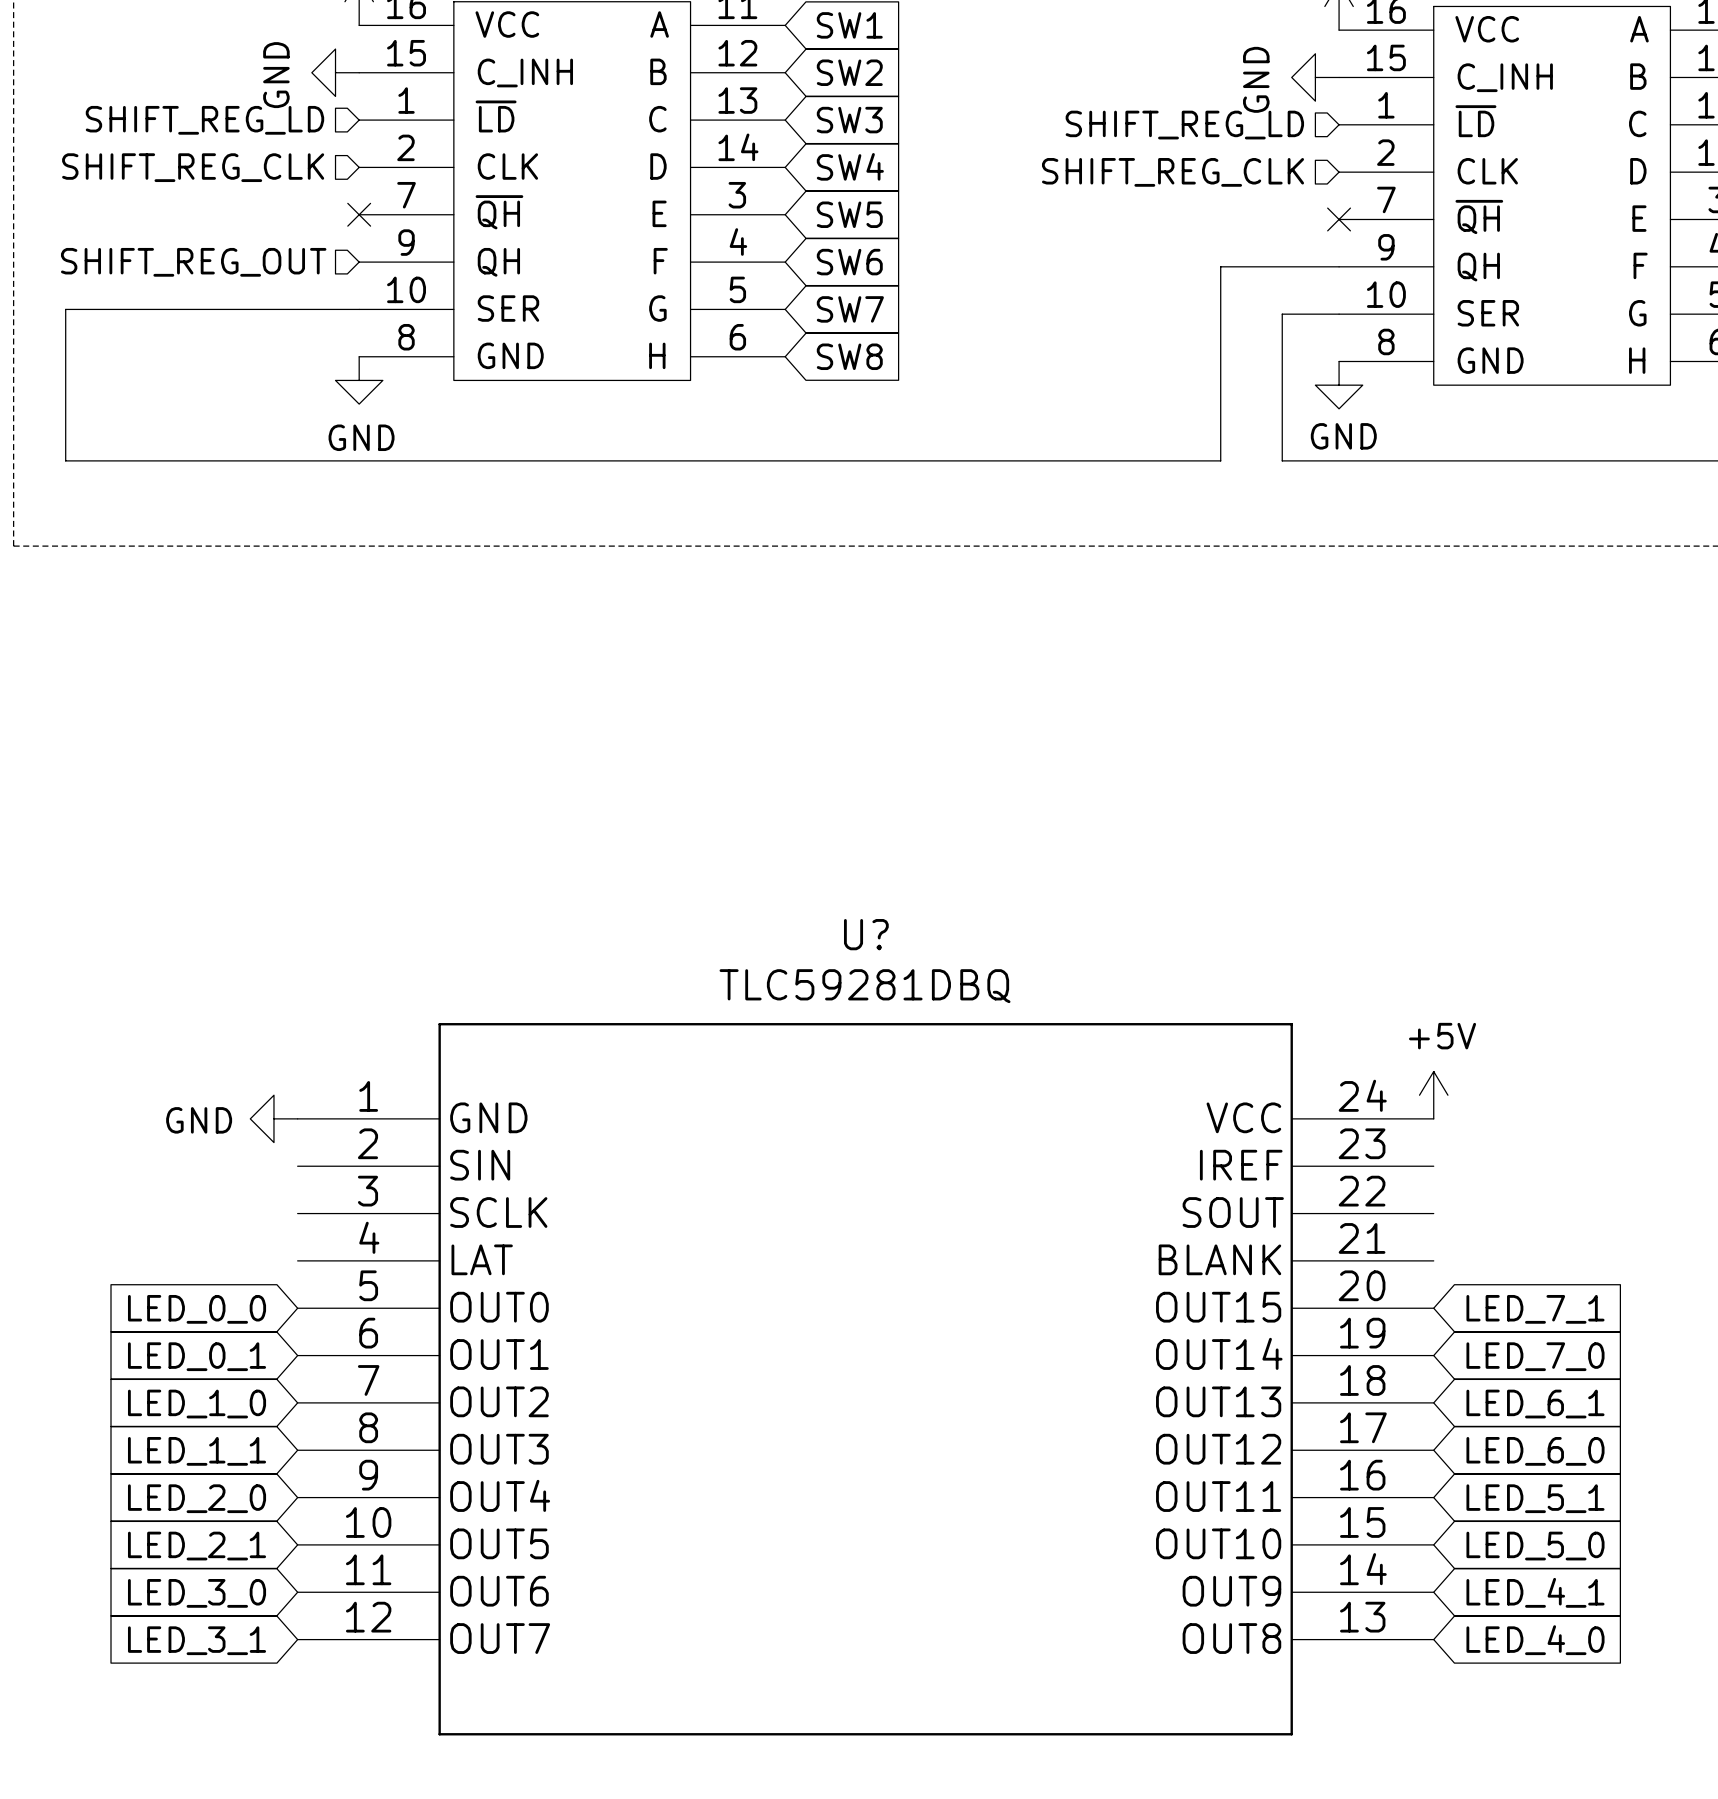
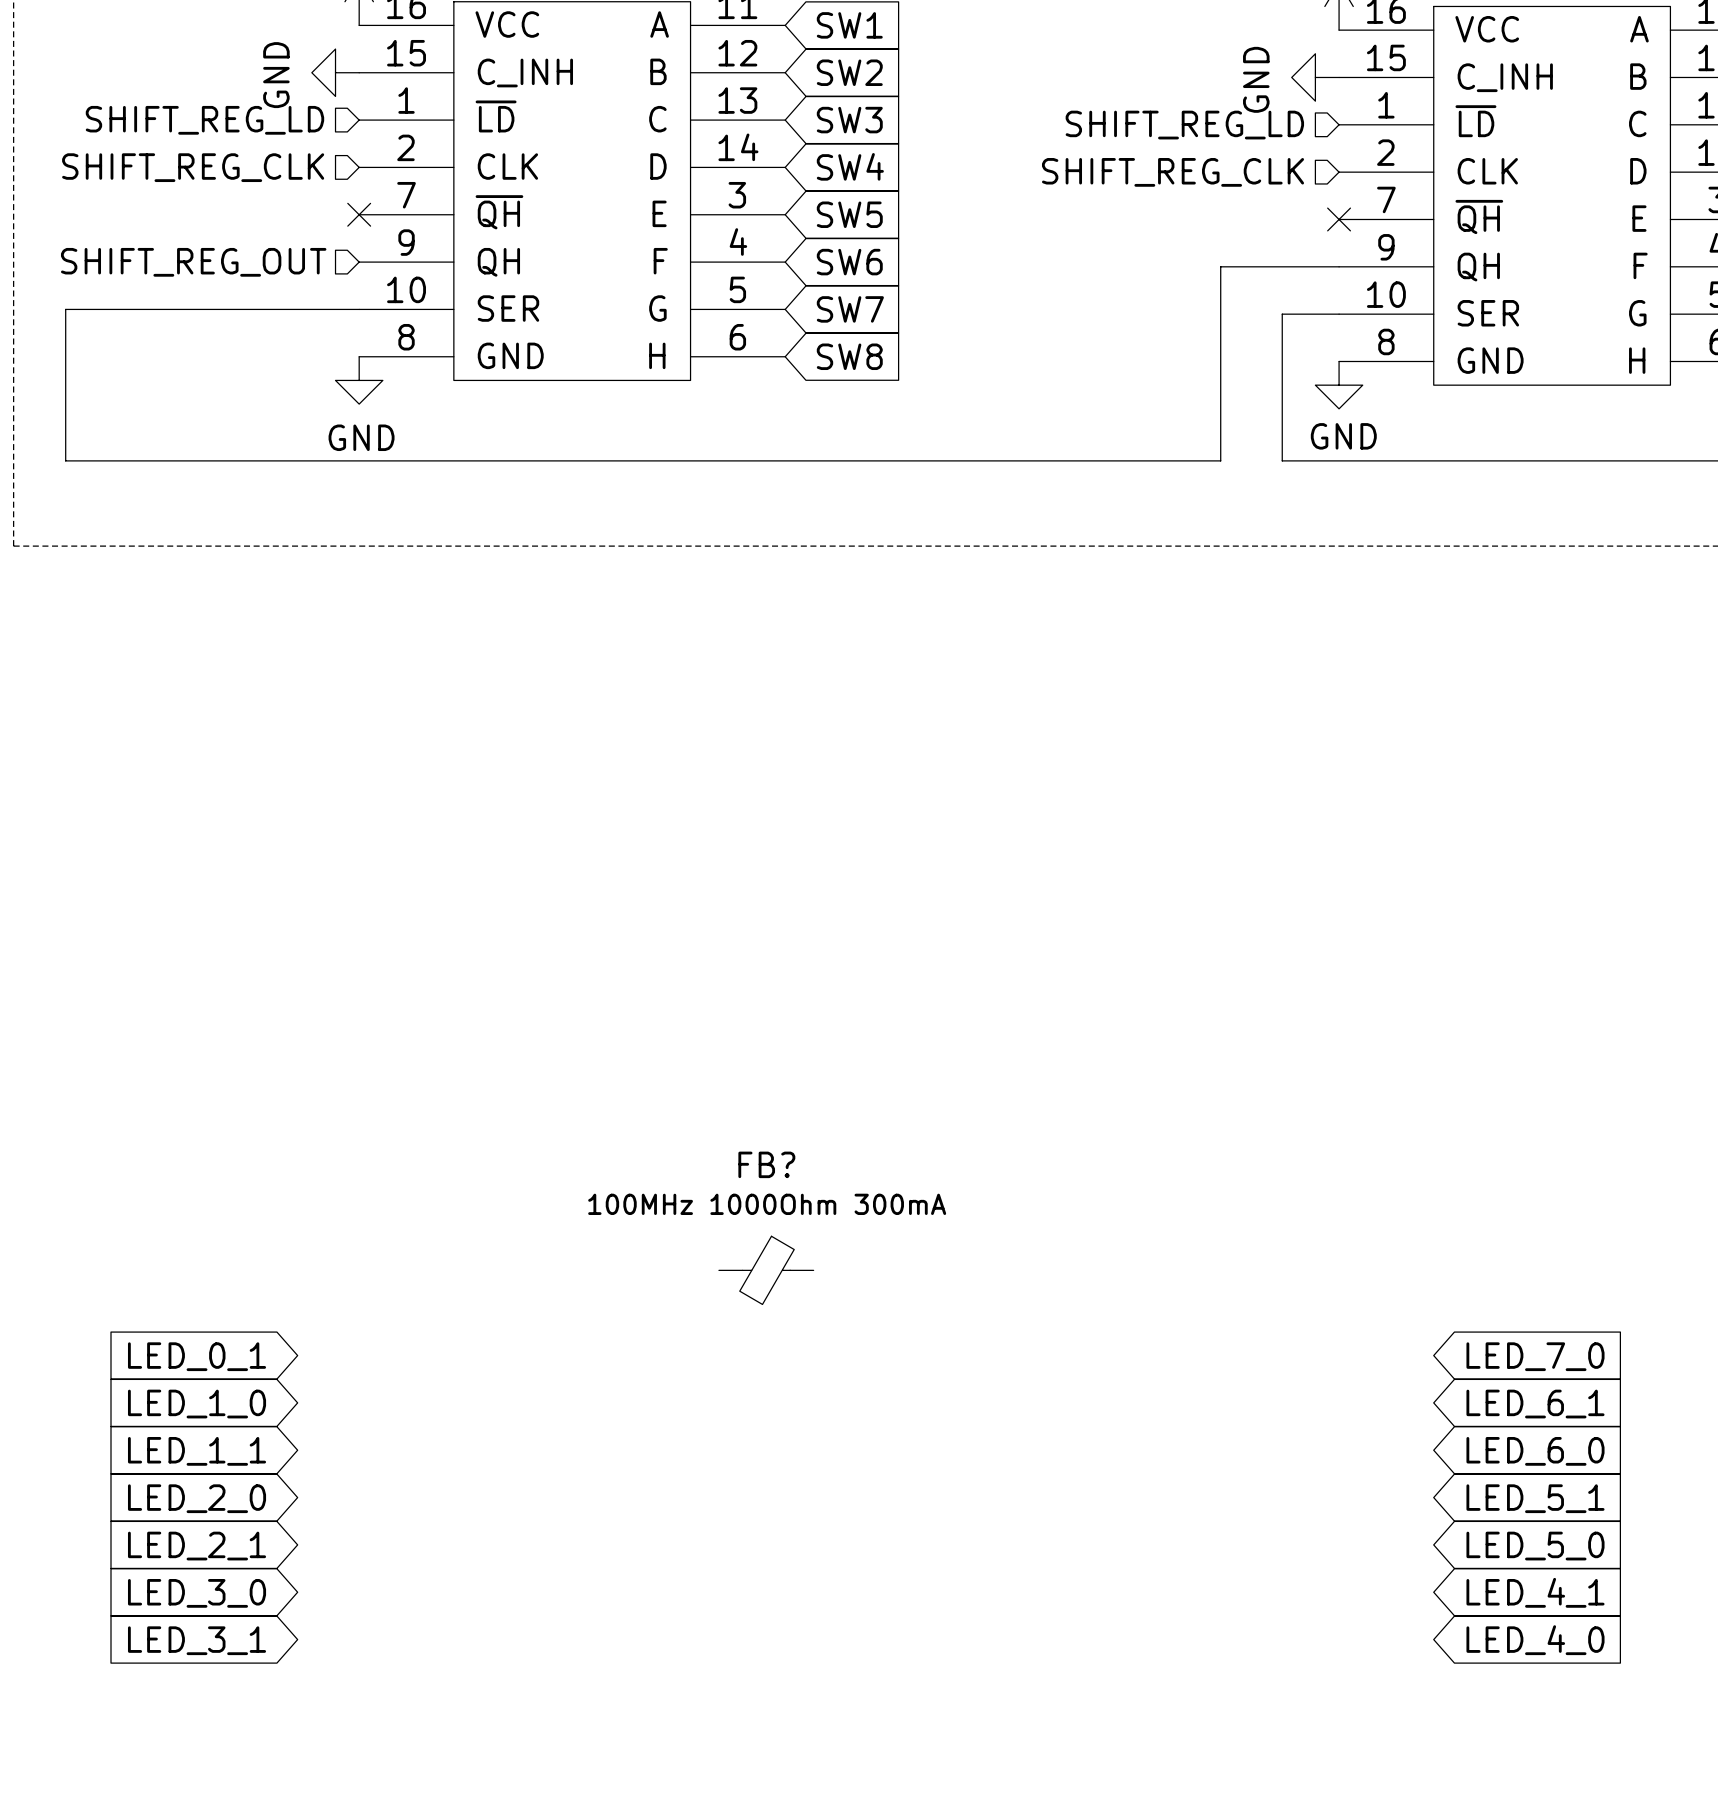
power symbol: +5V (1433, 1095) -> none
power symbol: GND (273, 1118) -> none
FB?: none -> 100MHz 1000Ohm 300mA (766, 1270)
global label: LED_0_0 (197, 1309) -> none
global label: LED_7_1 (1535, 1309) -> none
U?: TLC59281DBQ (865, 1379) -> none

